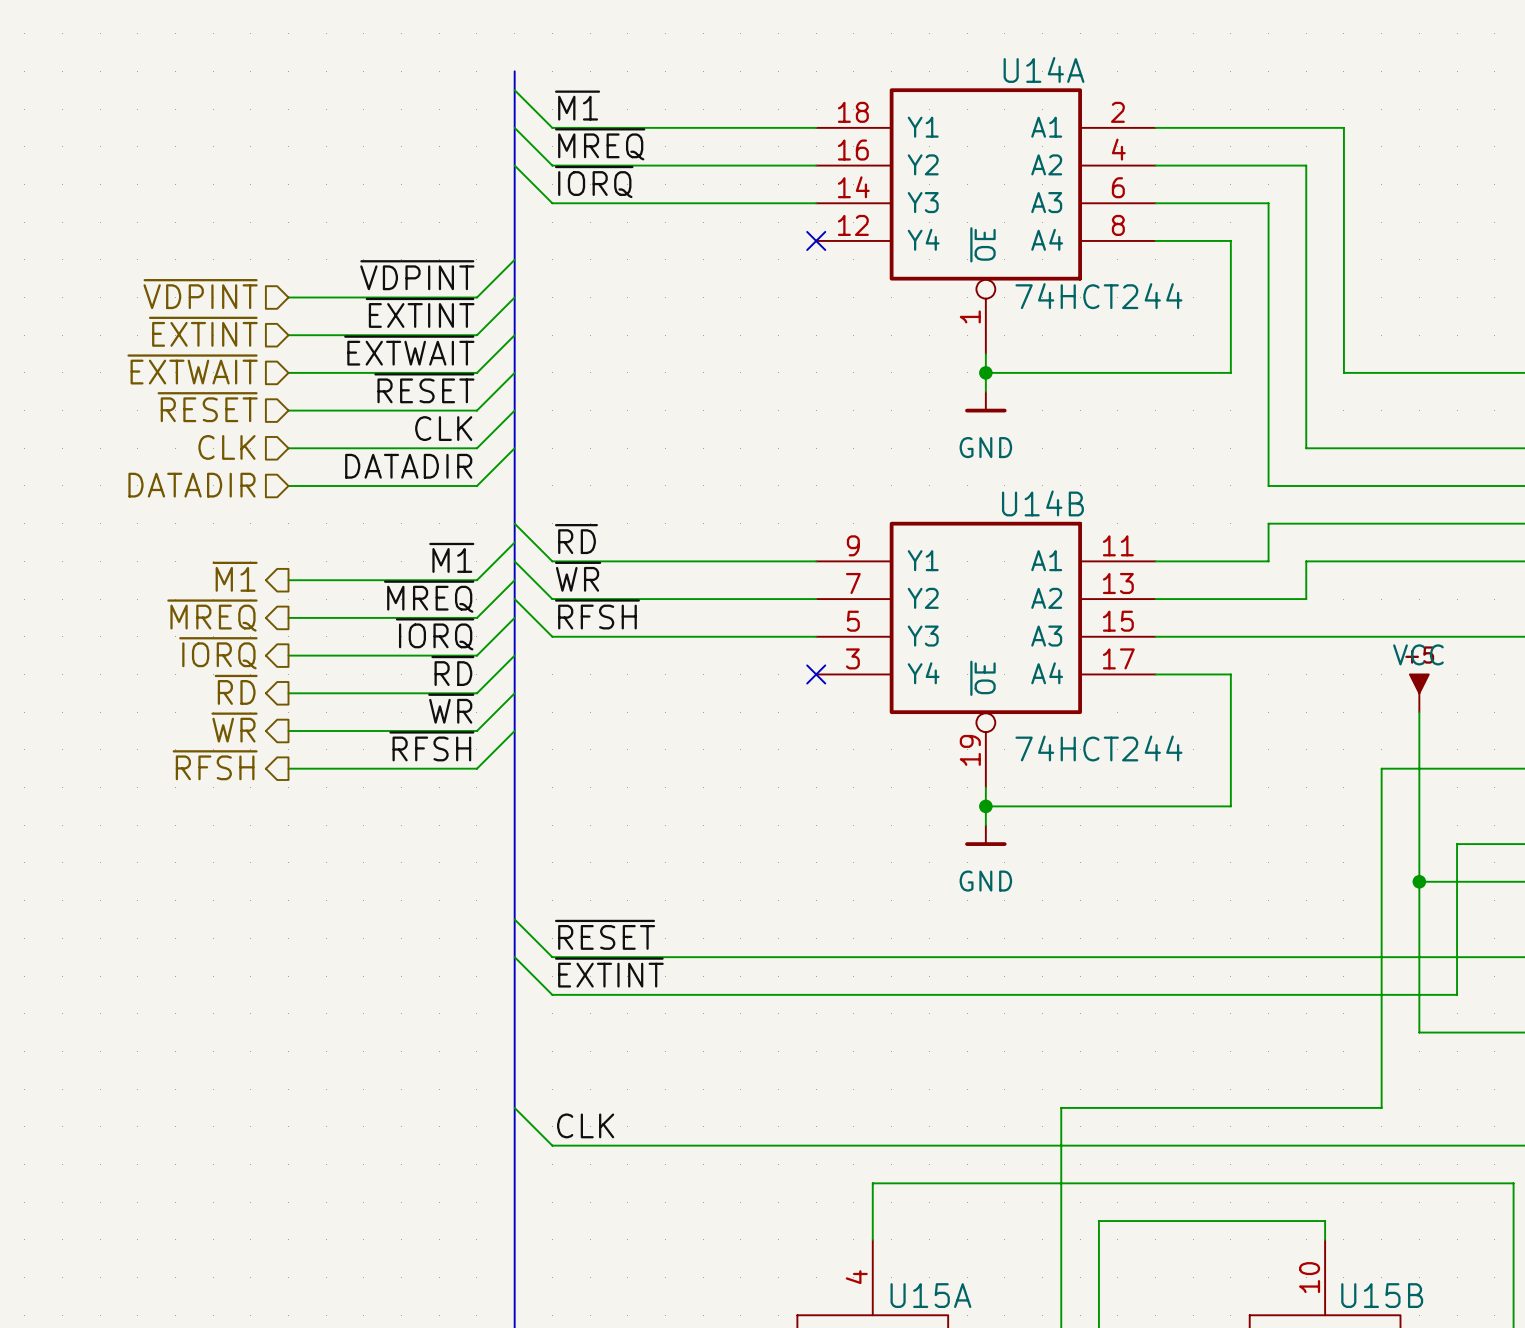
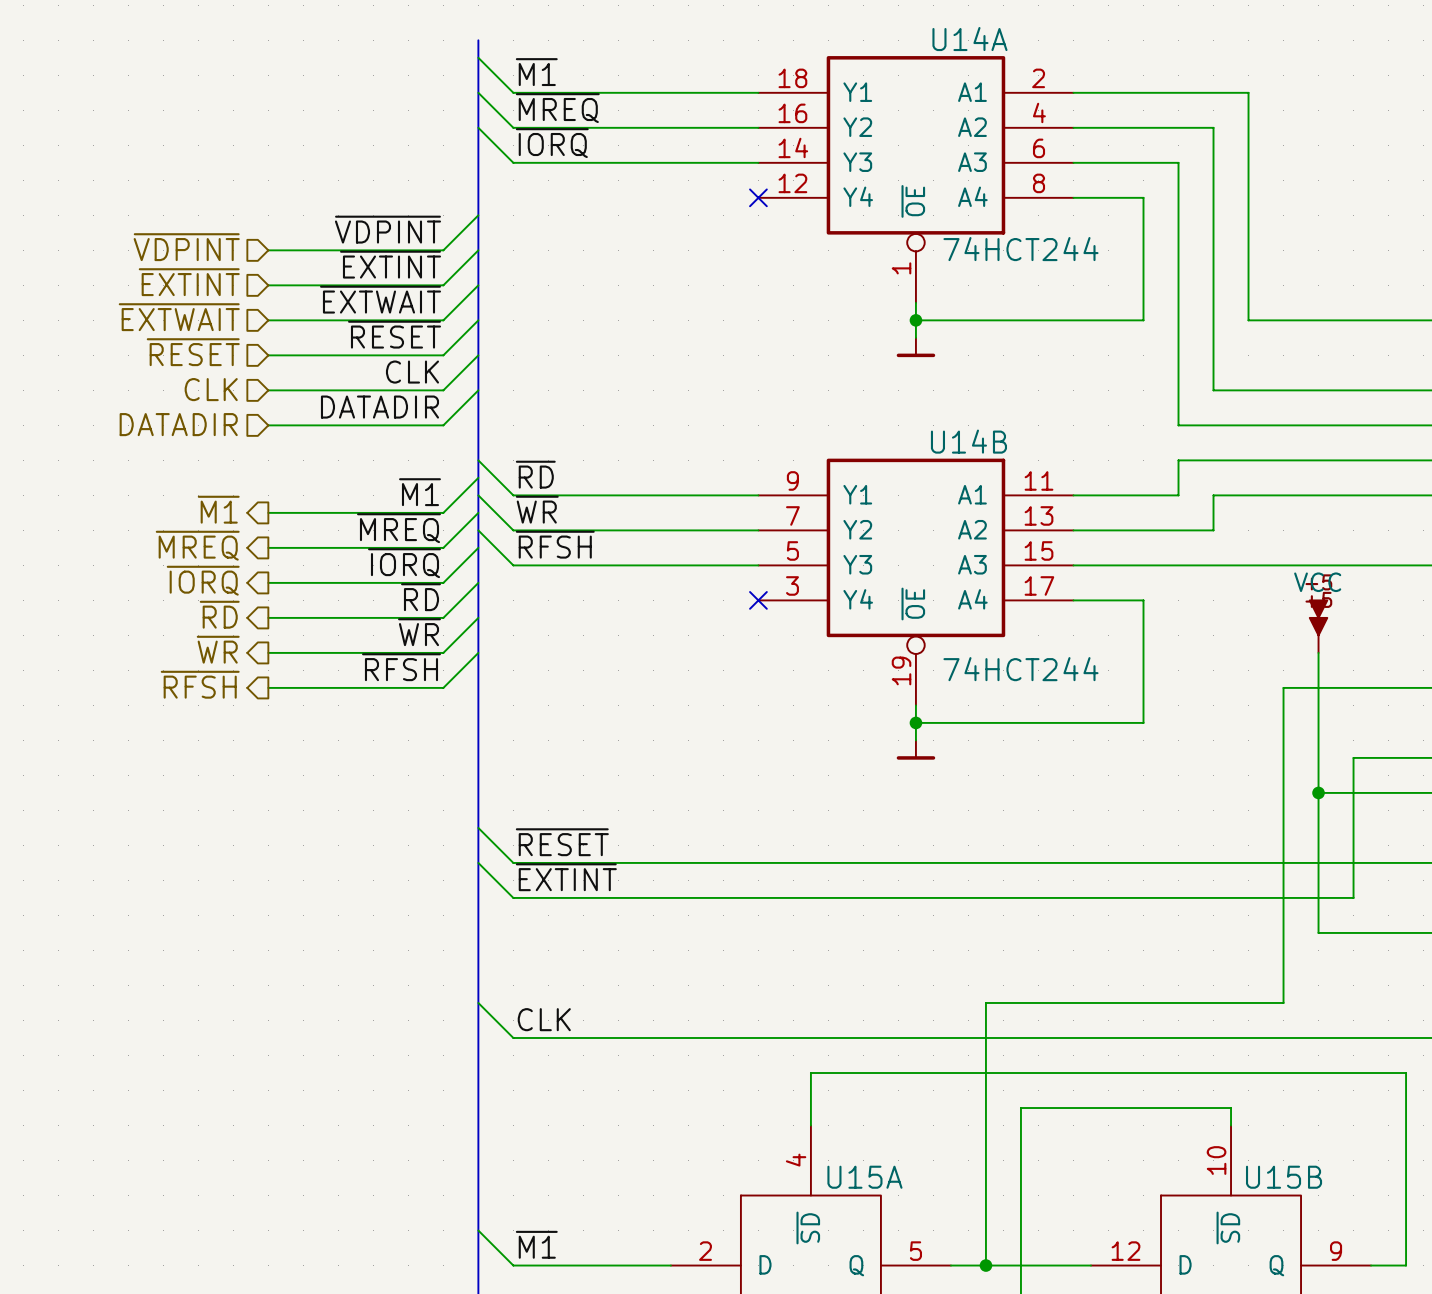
power symbol text: GND (985, 447) -> none
power symbol: none -> (1318, 635)
power symbol text: GND (985, 881) -> none

